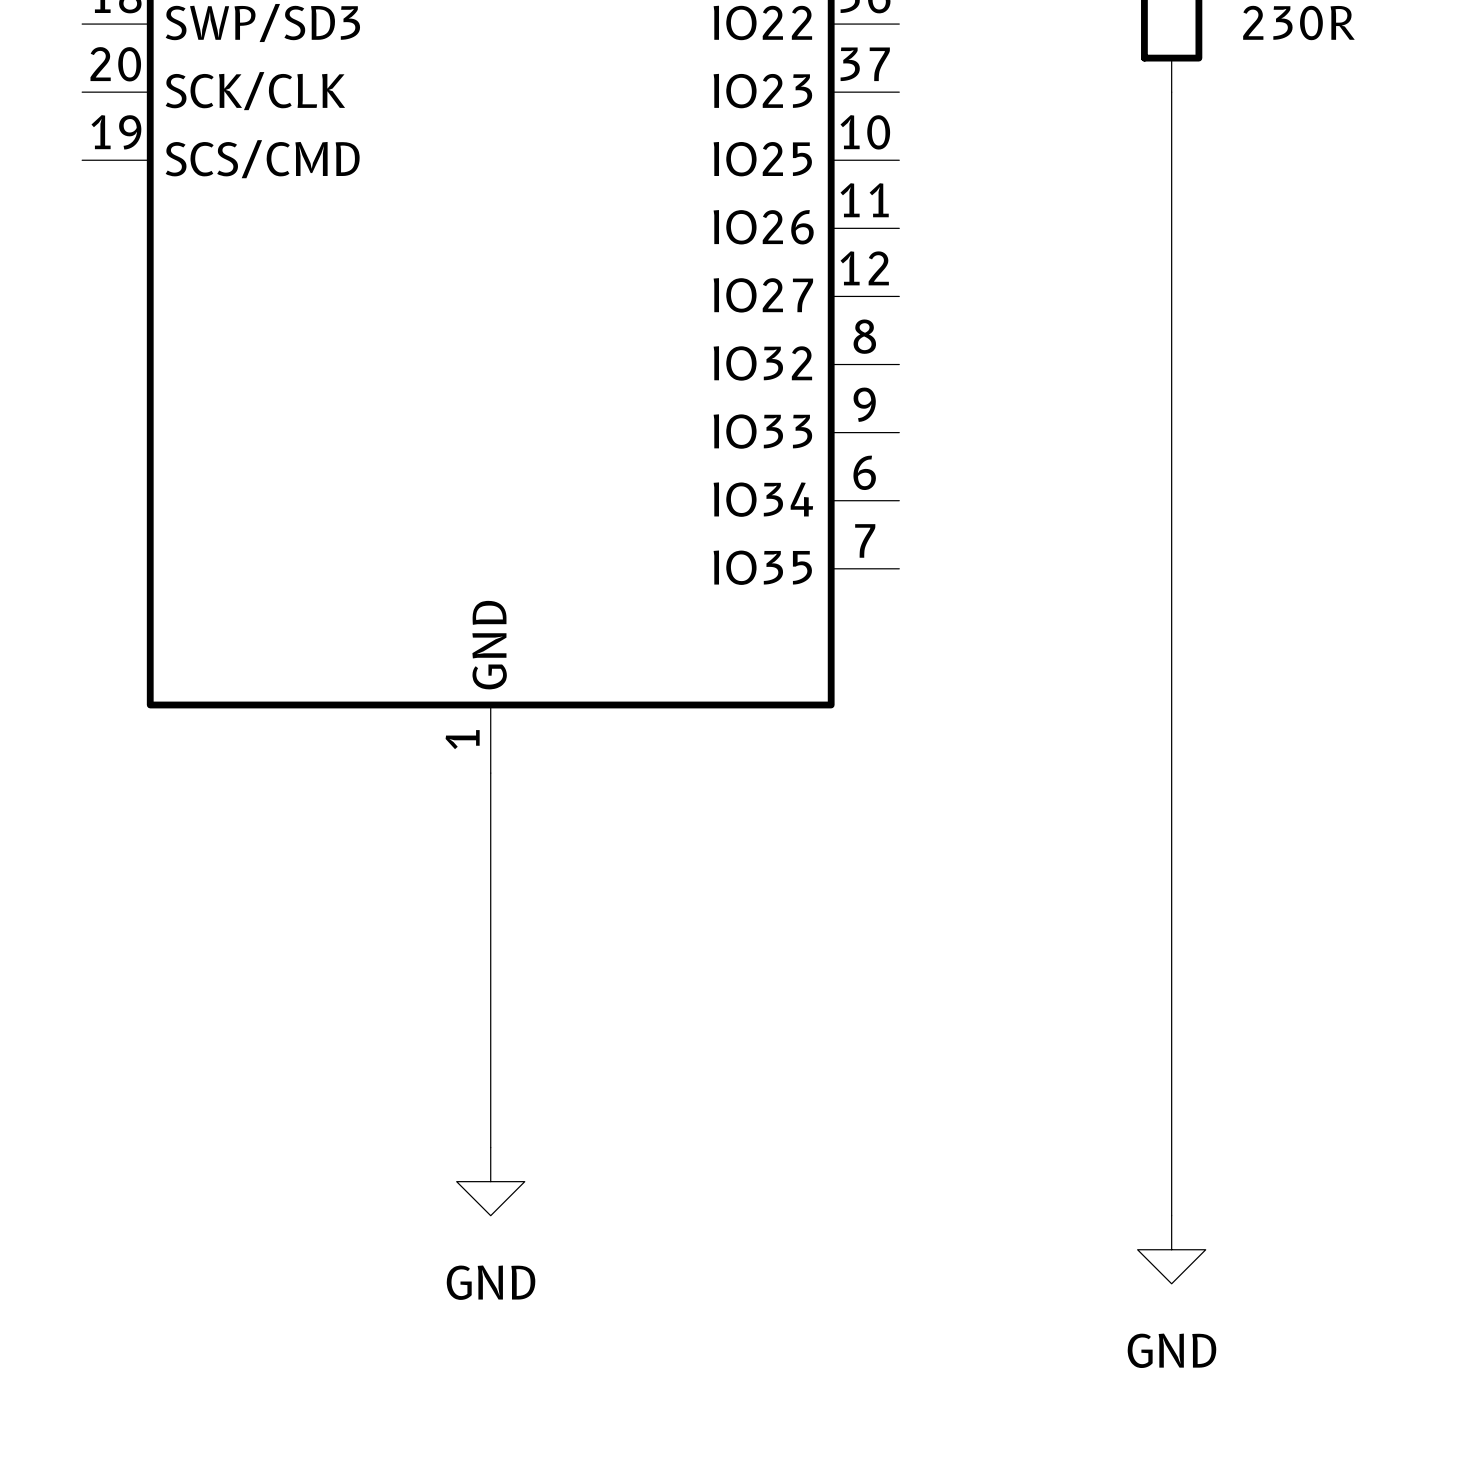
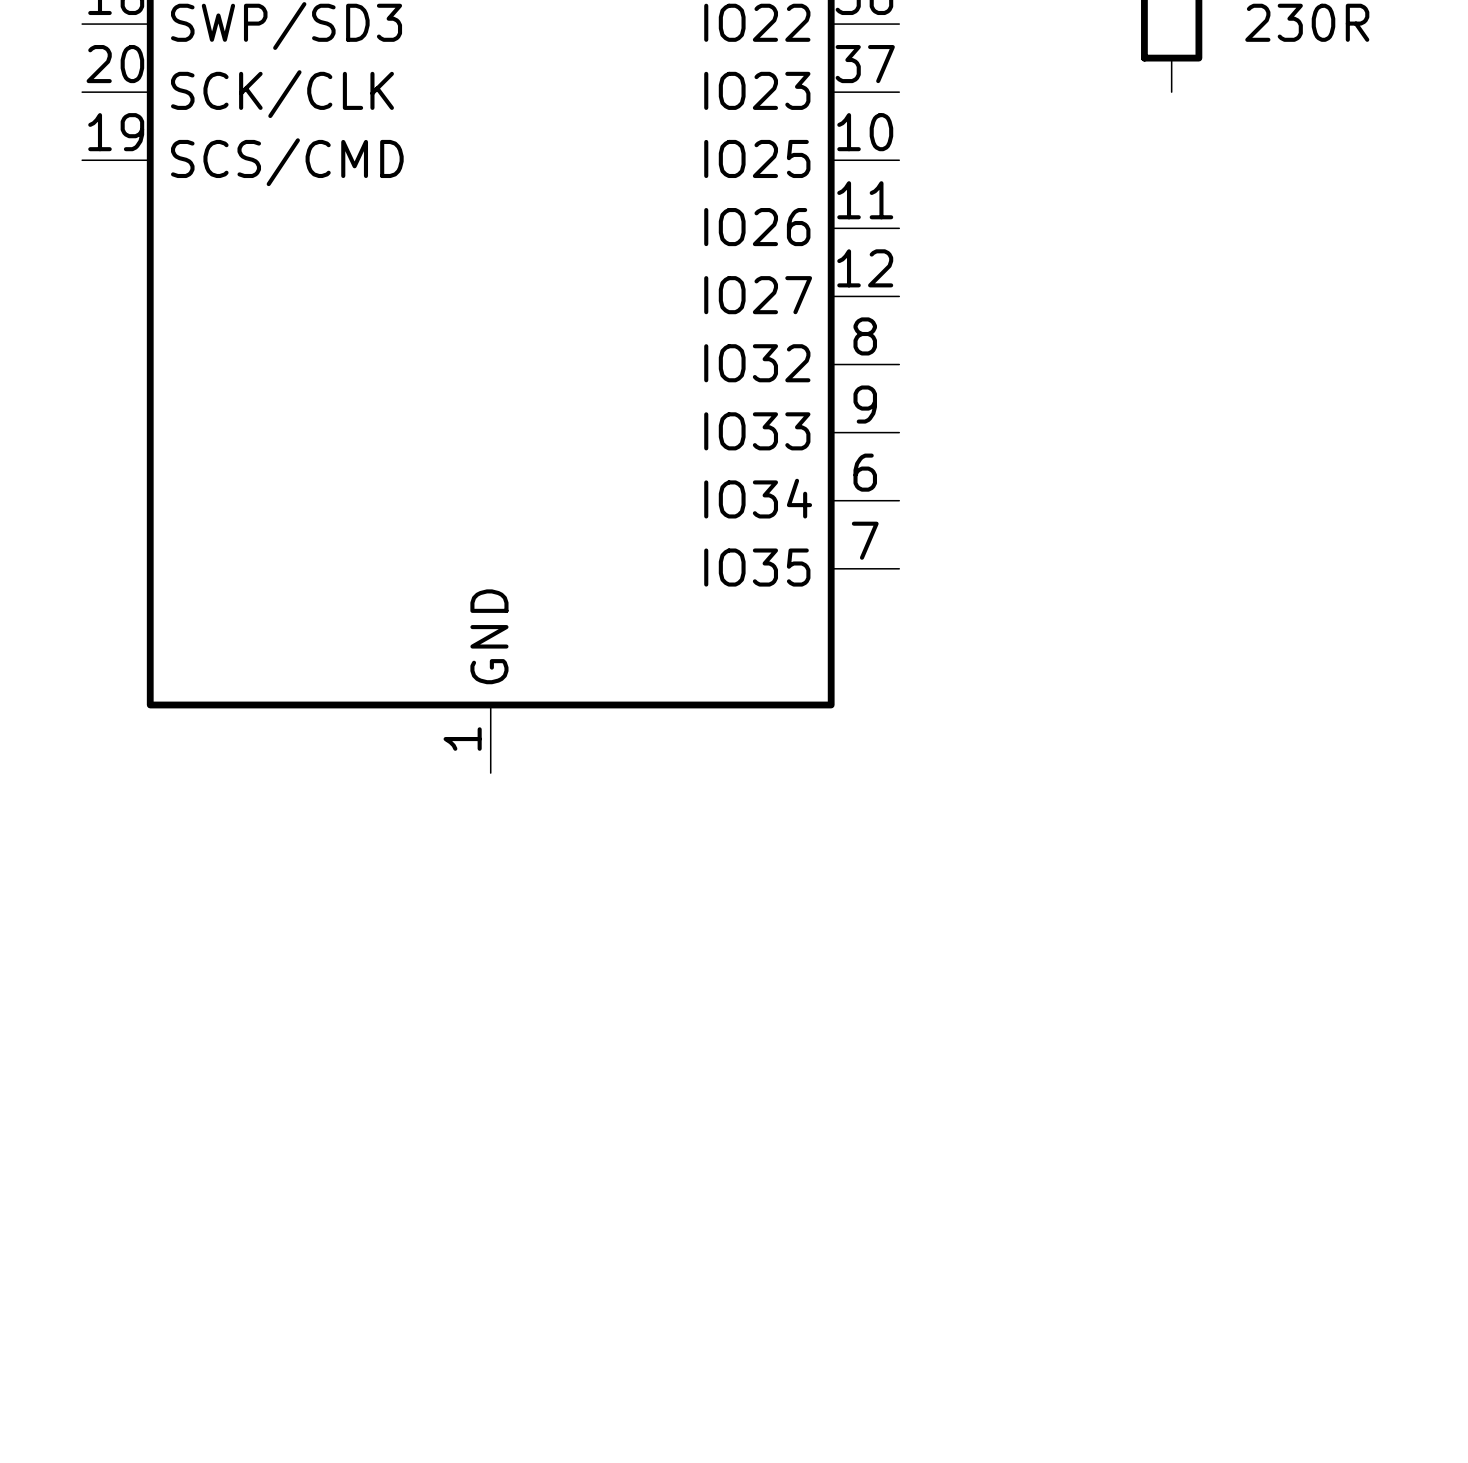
wire: (1171, 92) (1171, 1215) -> none
wire: (490, 773) (490, 1147) -> none
power symbol: GND (490, 1181) -> none
power symbol: GND (1171, 1249) -> none

